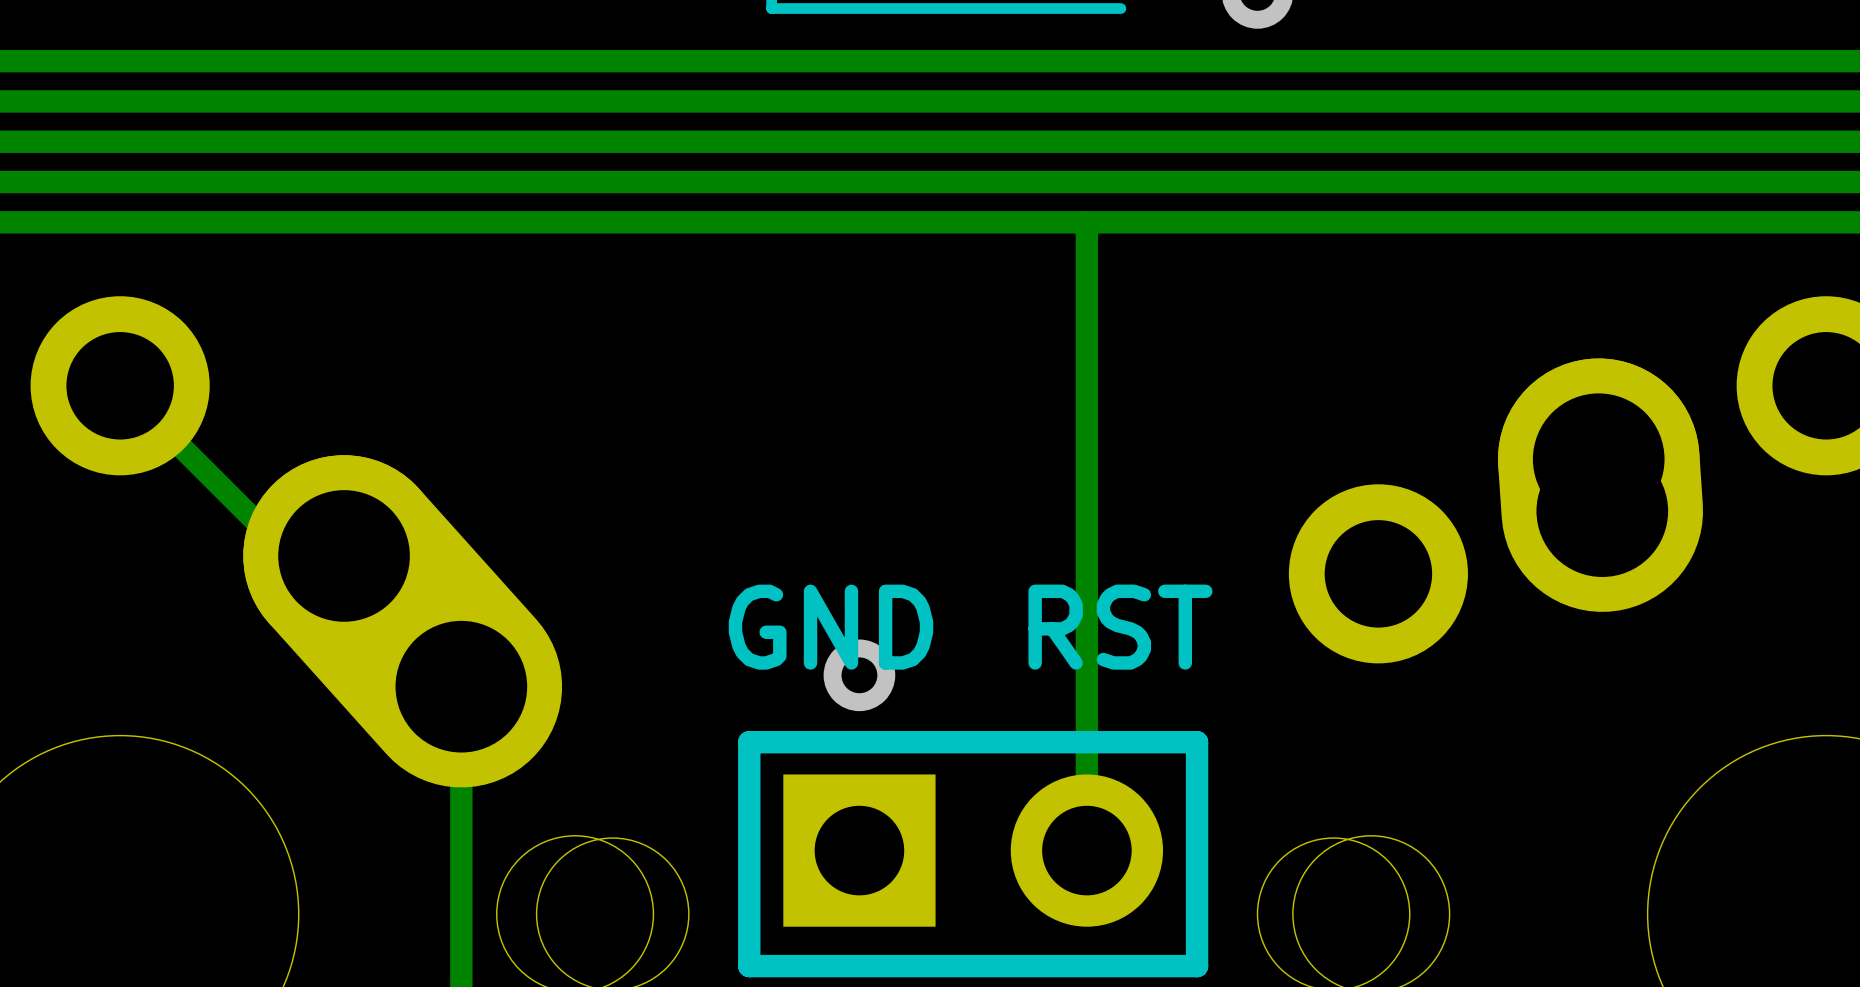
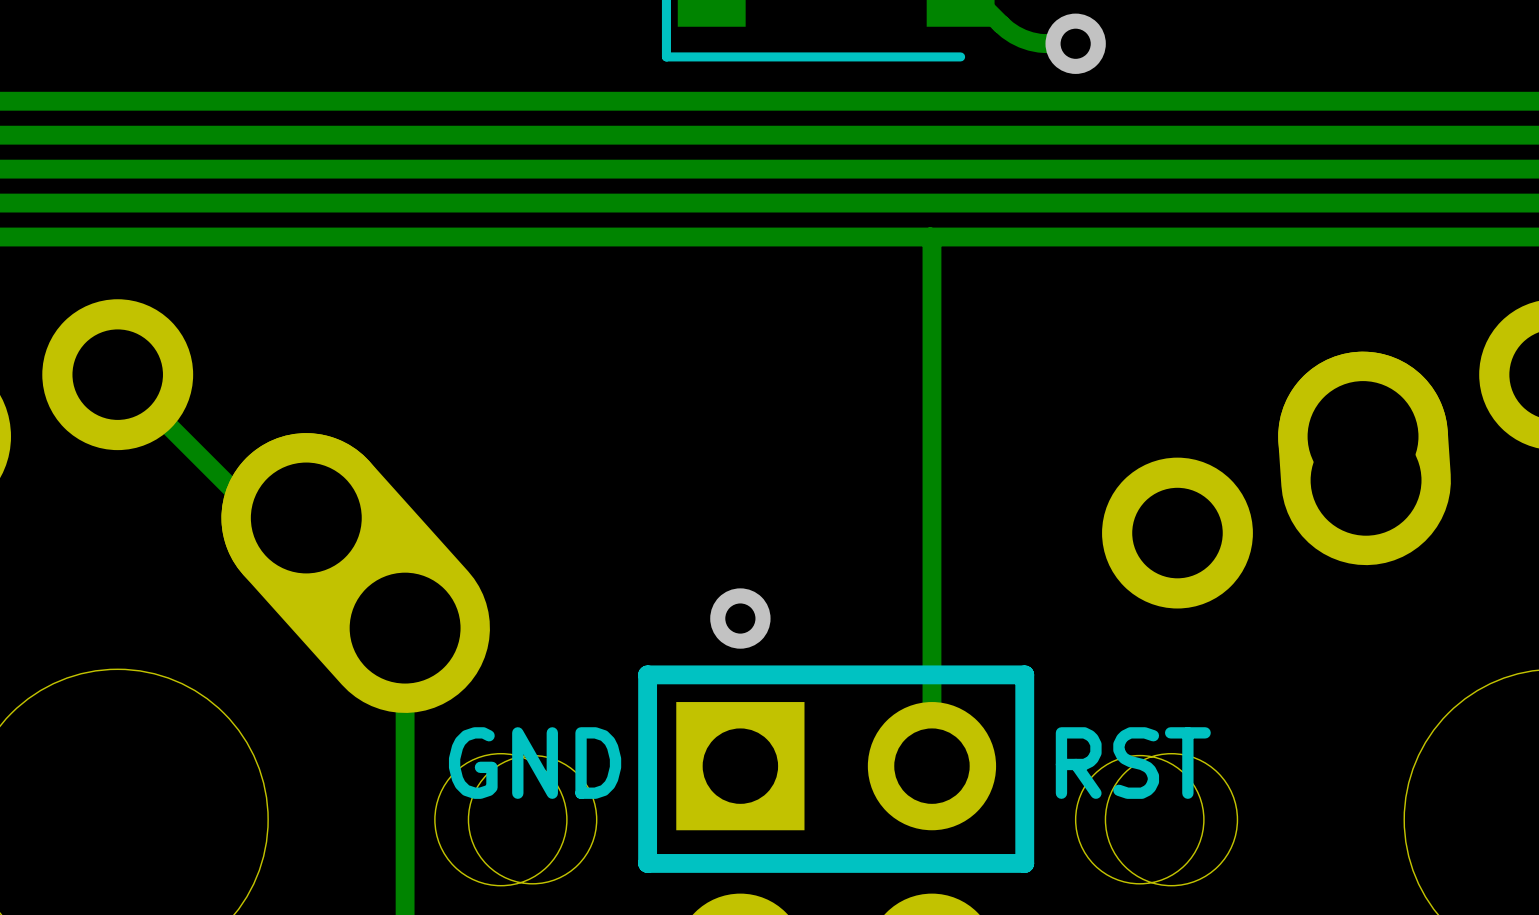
part text position: GND (831, 627) -> GND (535, 763)
part text position: RST (1120, 627) -> RST (1133, 763)

